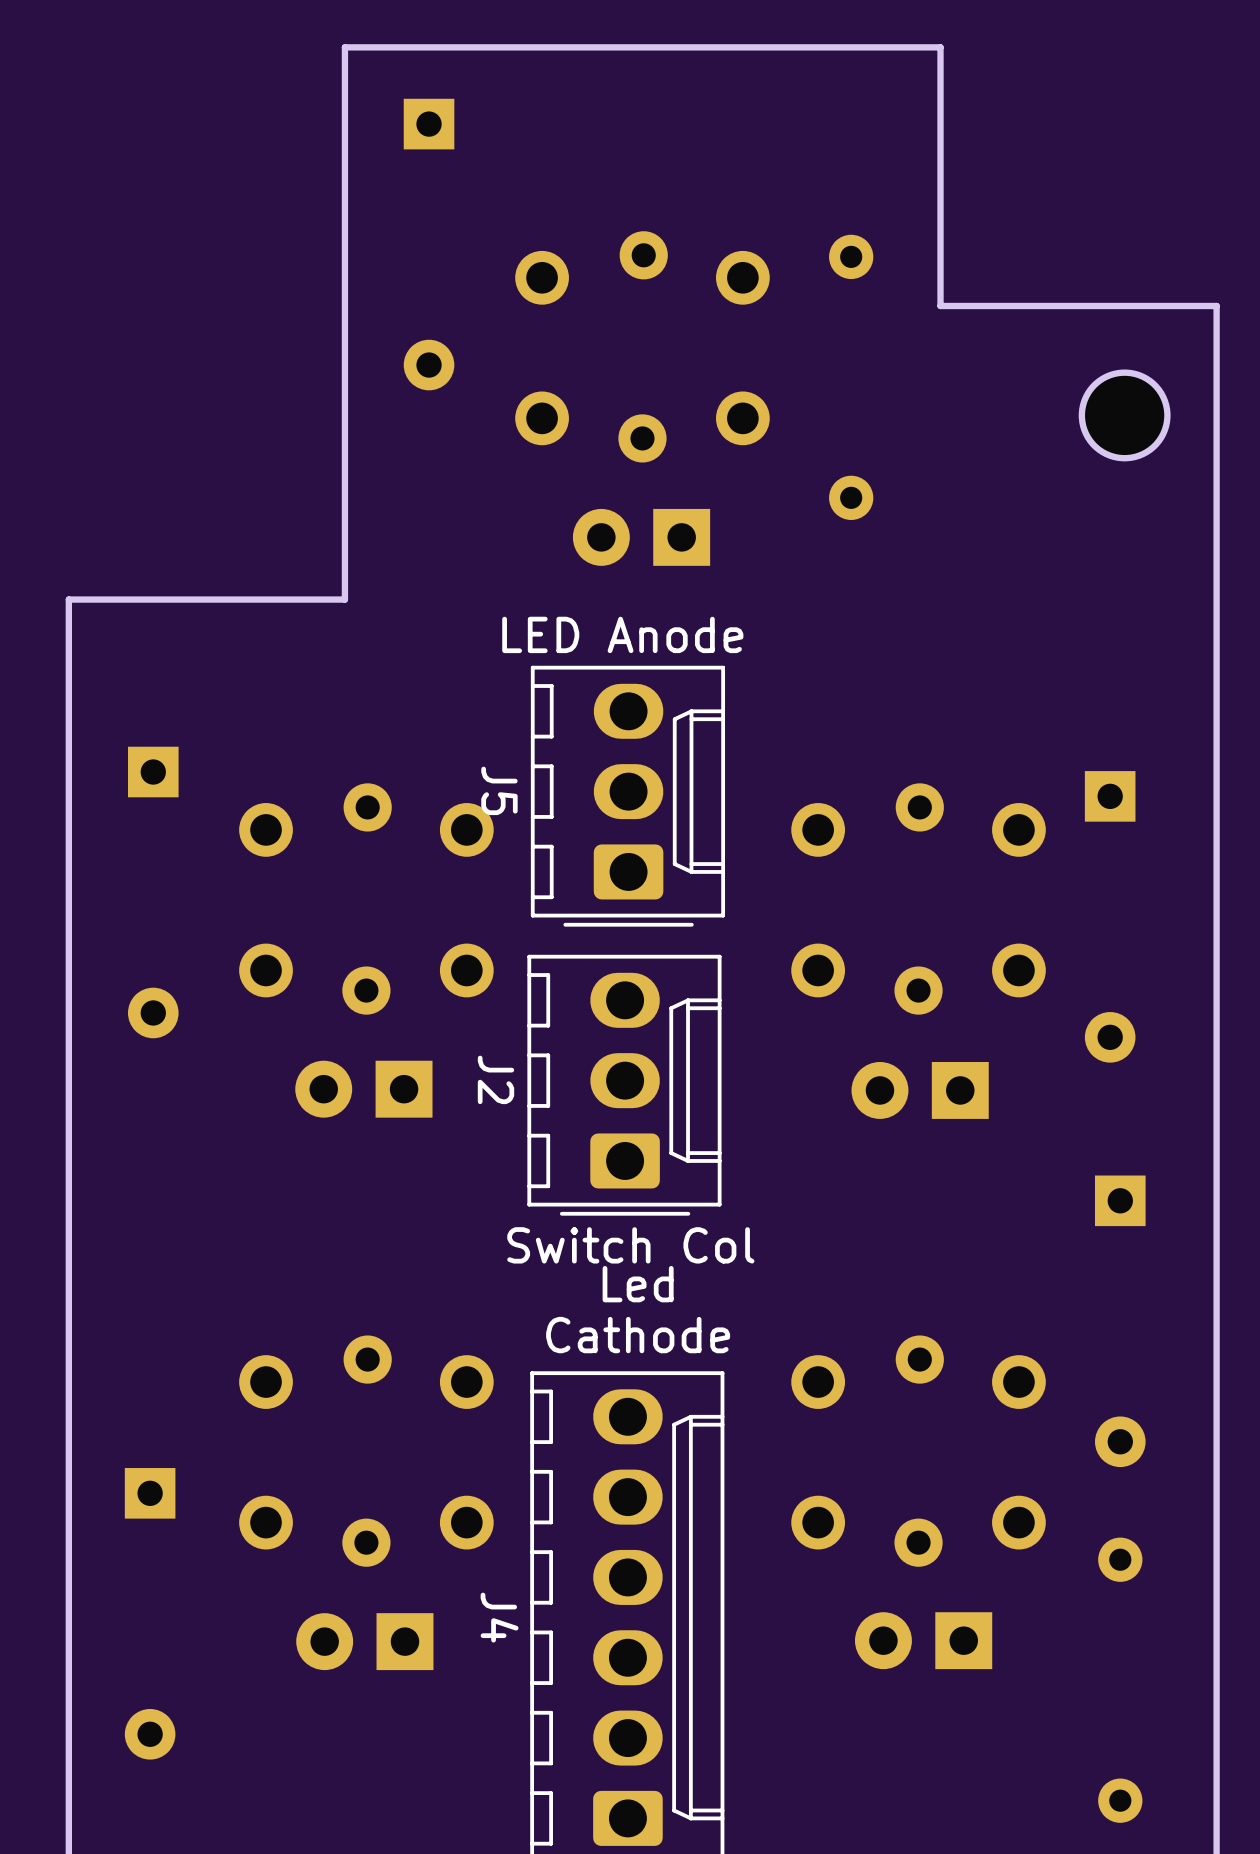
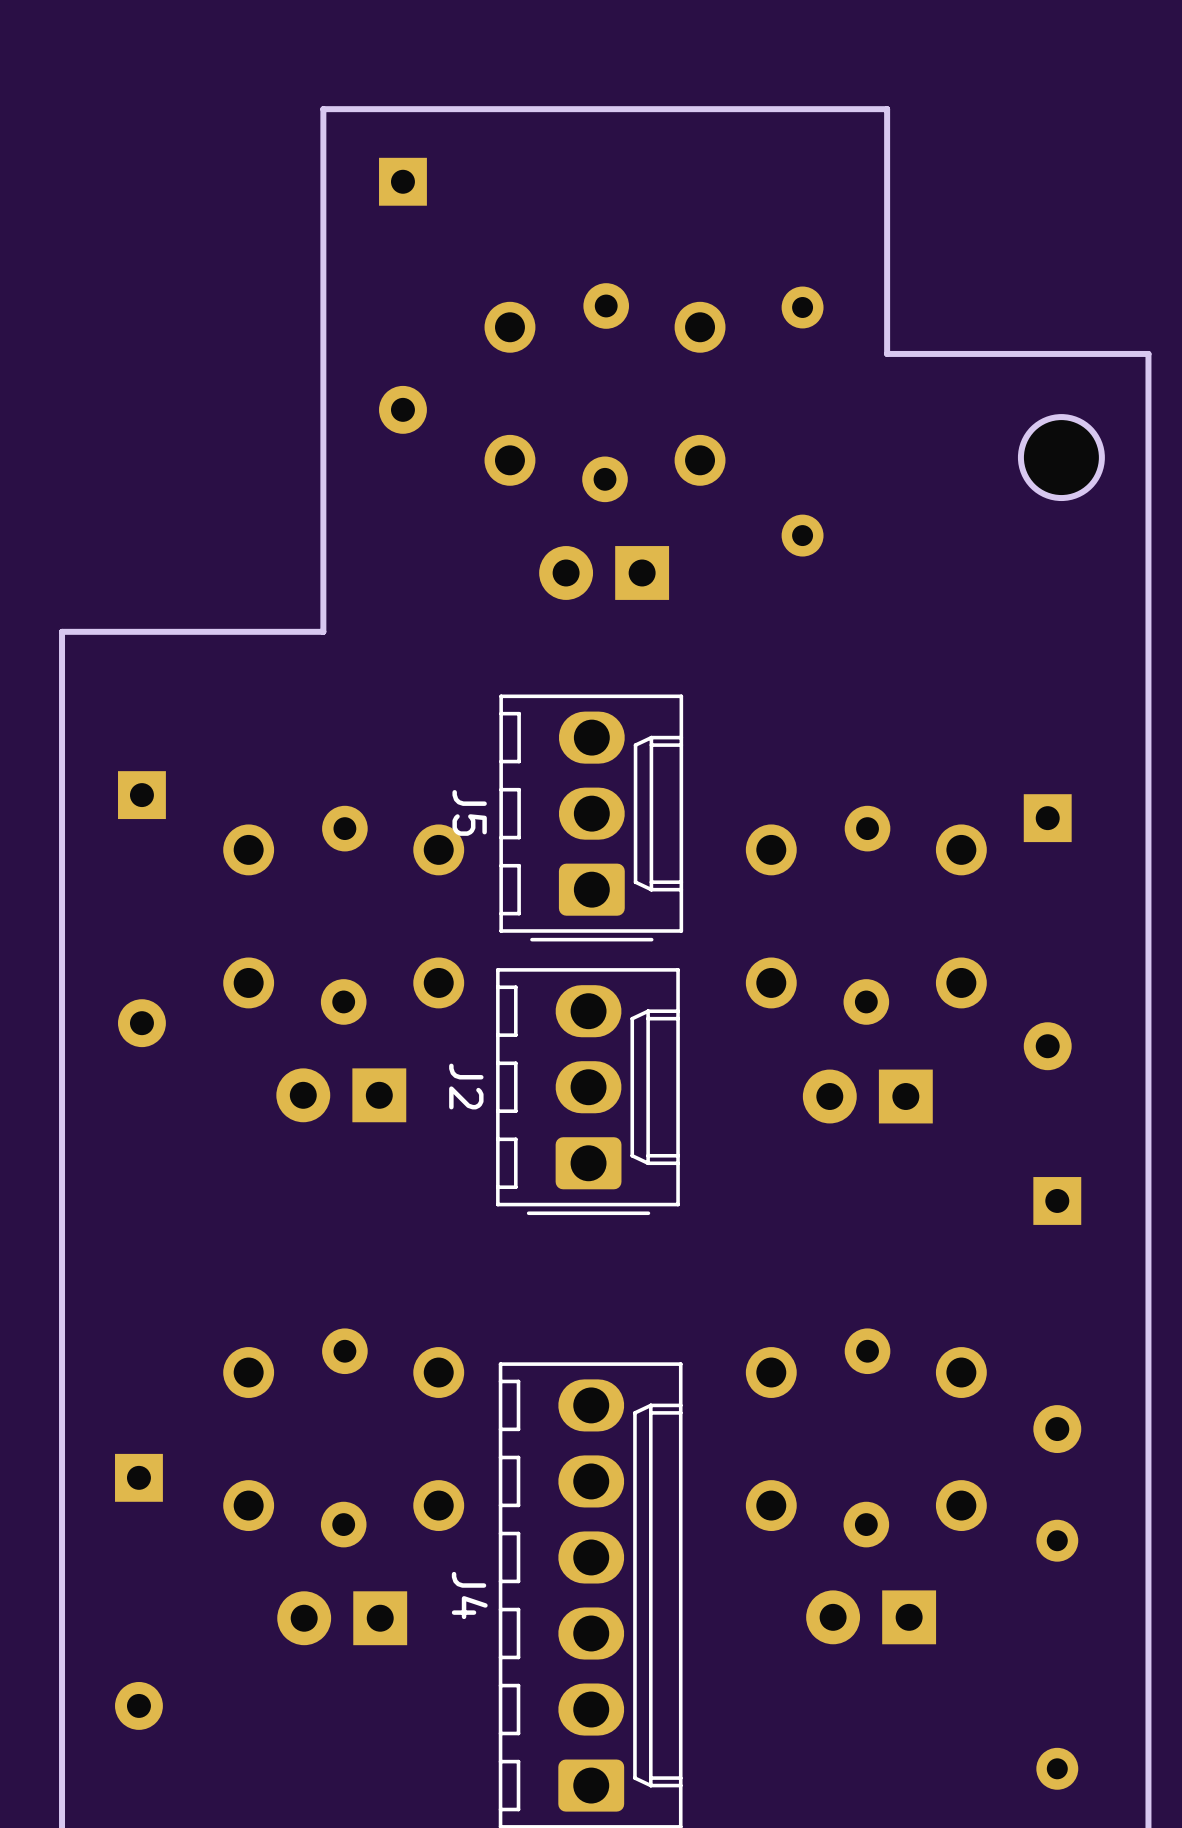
text: LED Anode (622, 634) -> none
text: Switch Col (630, 1245) -> none
text: Led (638, 1284) -> none
text: Cathode (638, 1335) -> none

